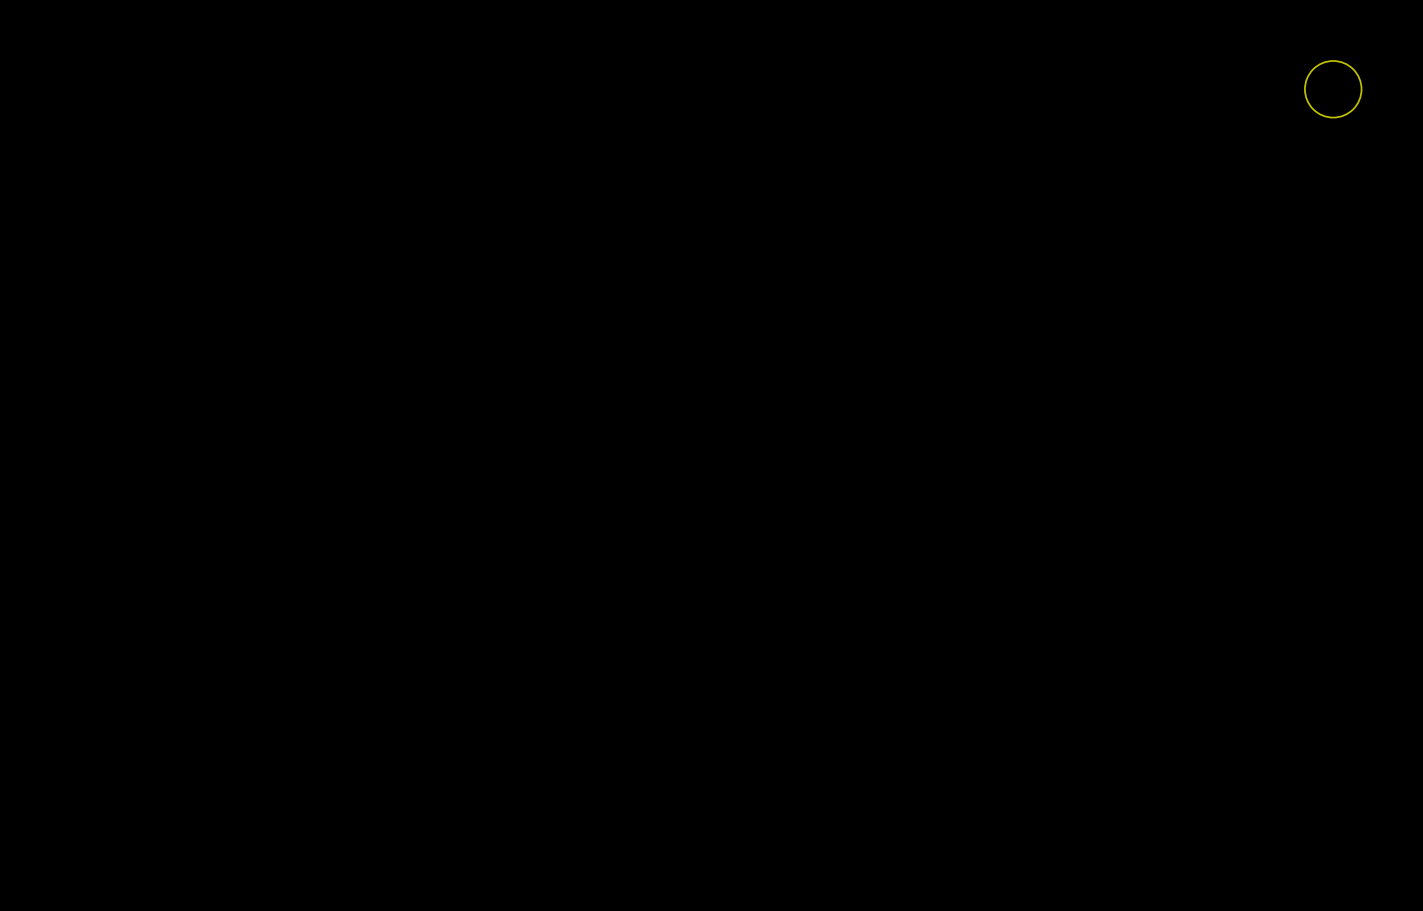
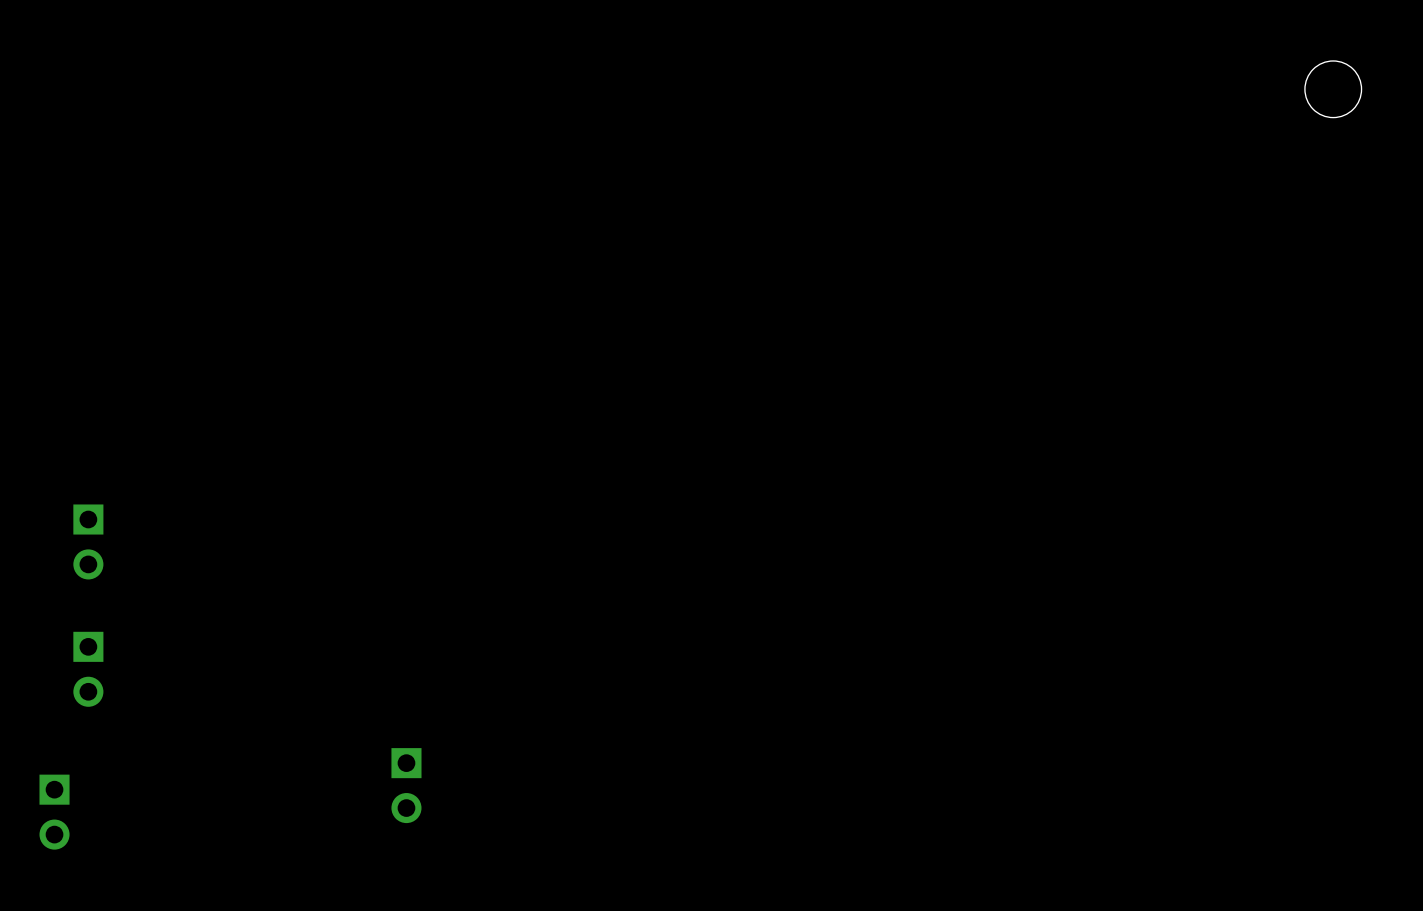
part: none -> (88, 541)
part: none -> (88, 669)
part: none -> (406, 785)
part: none -> (54, 812)

